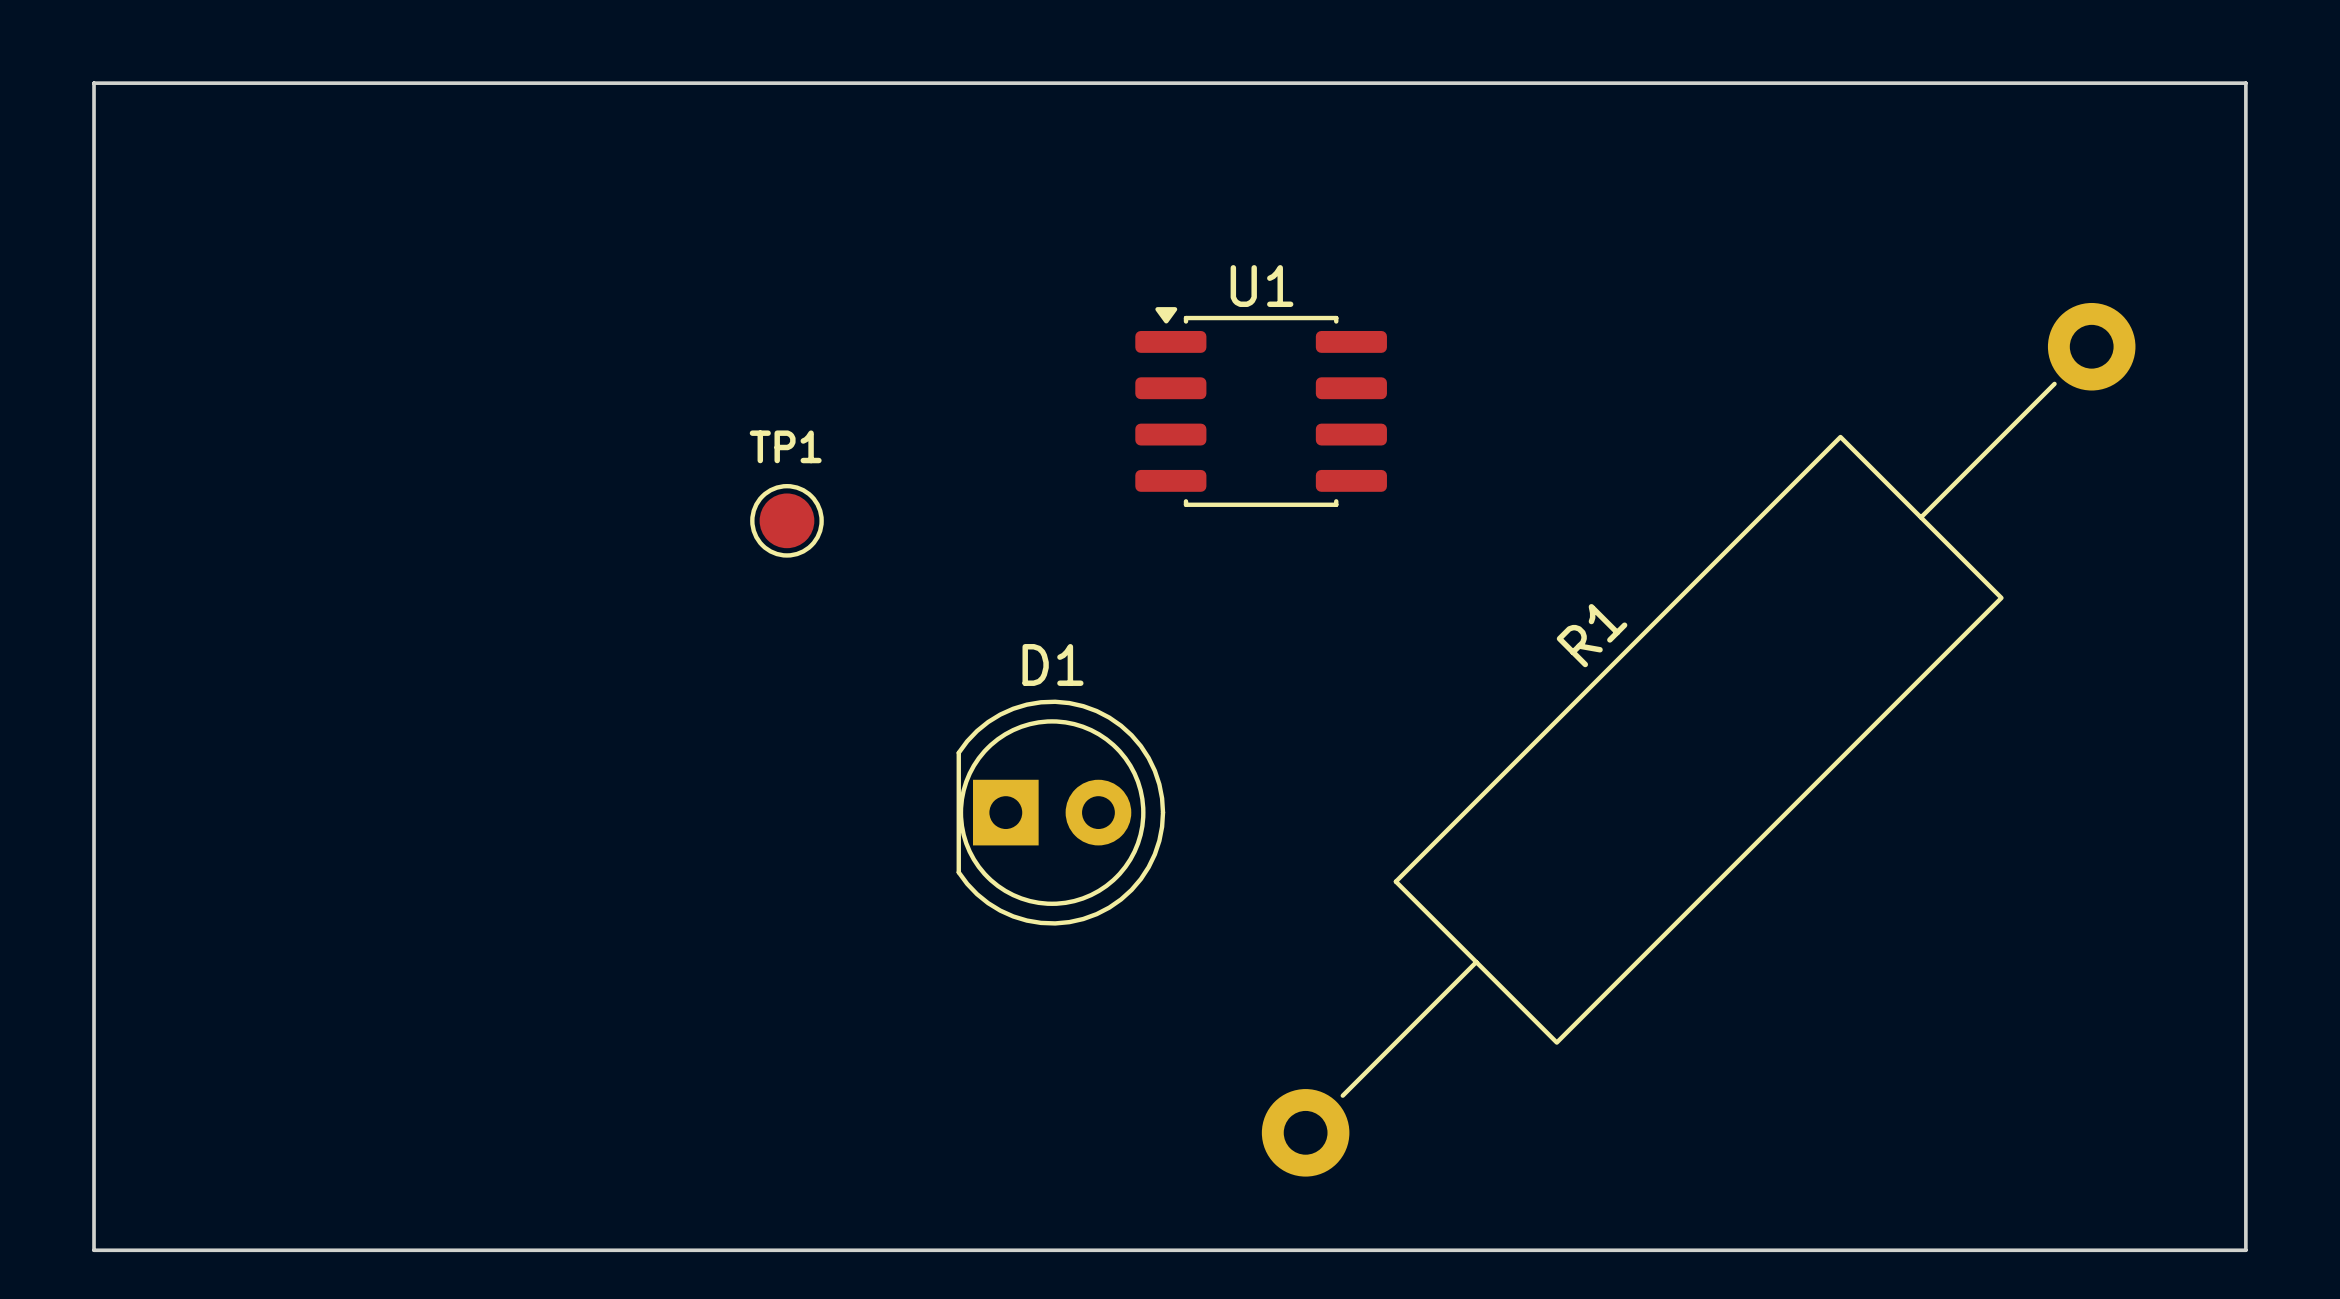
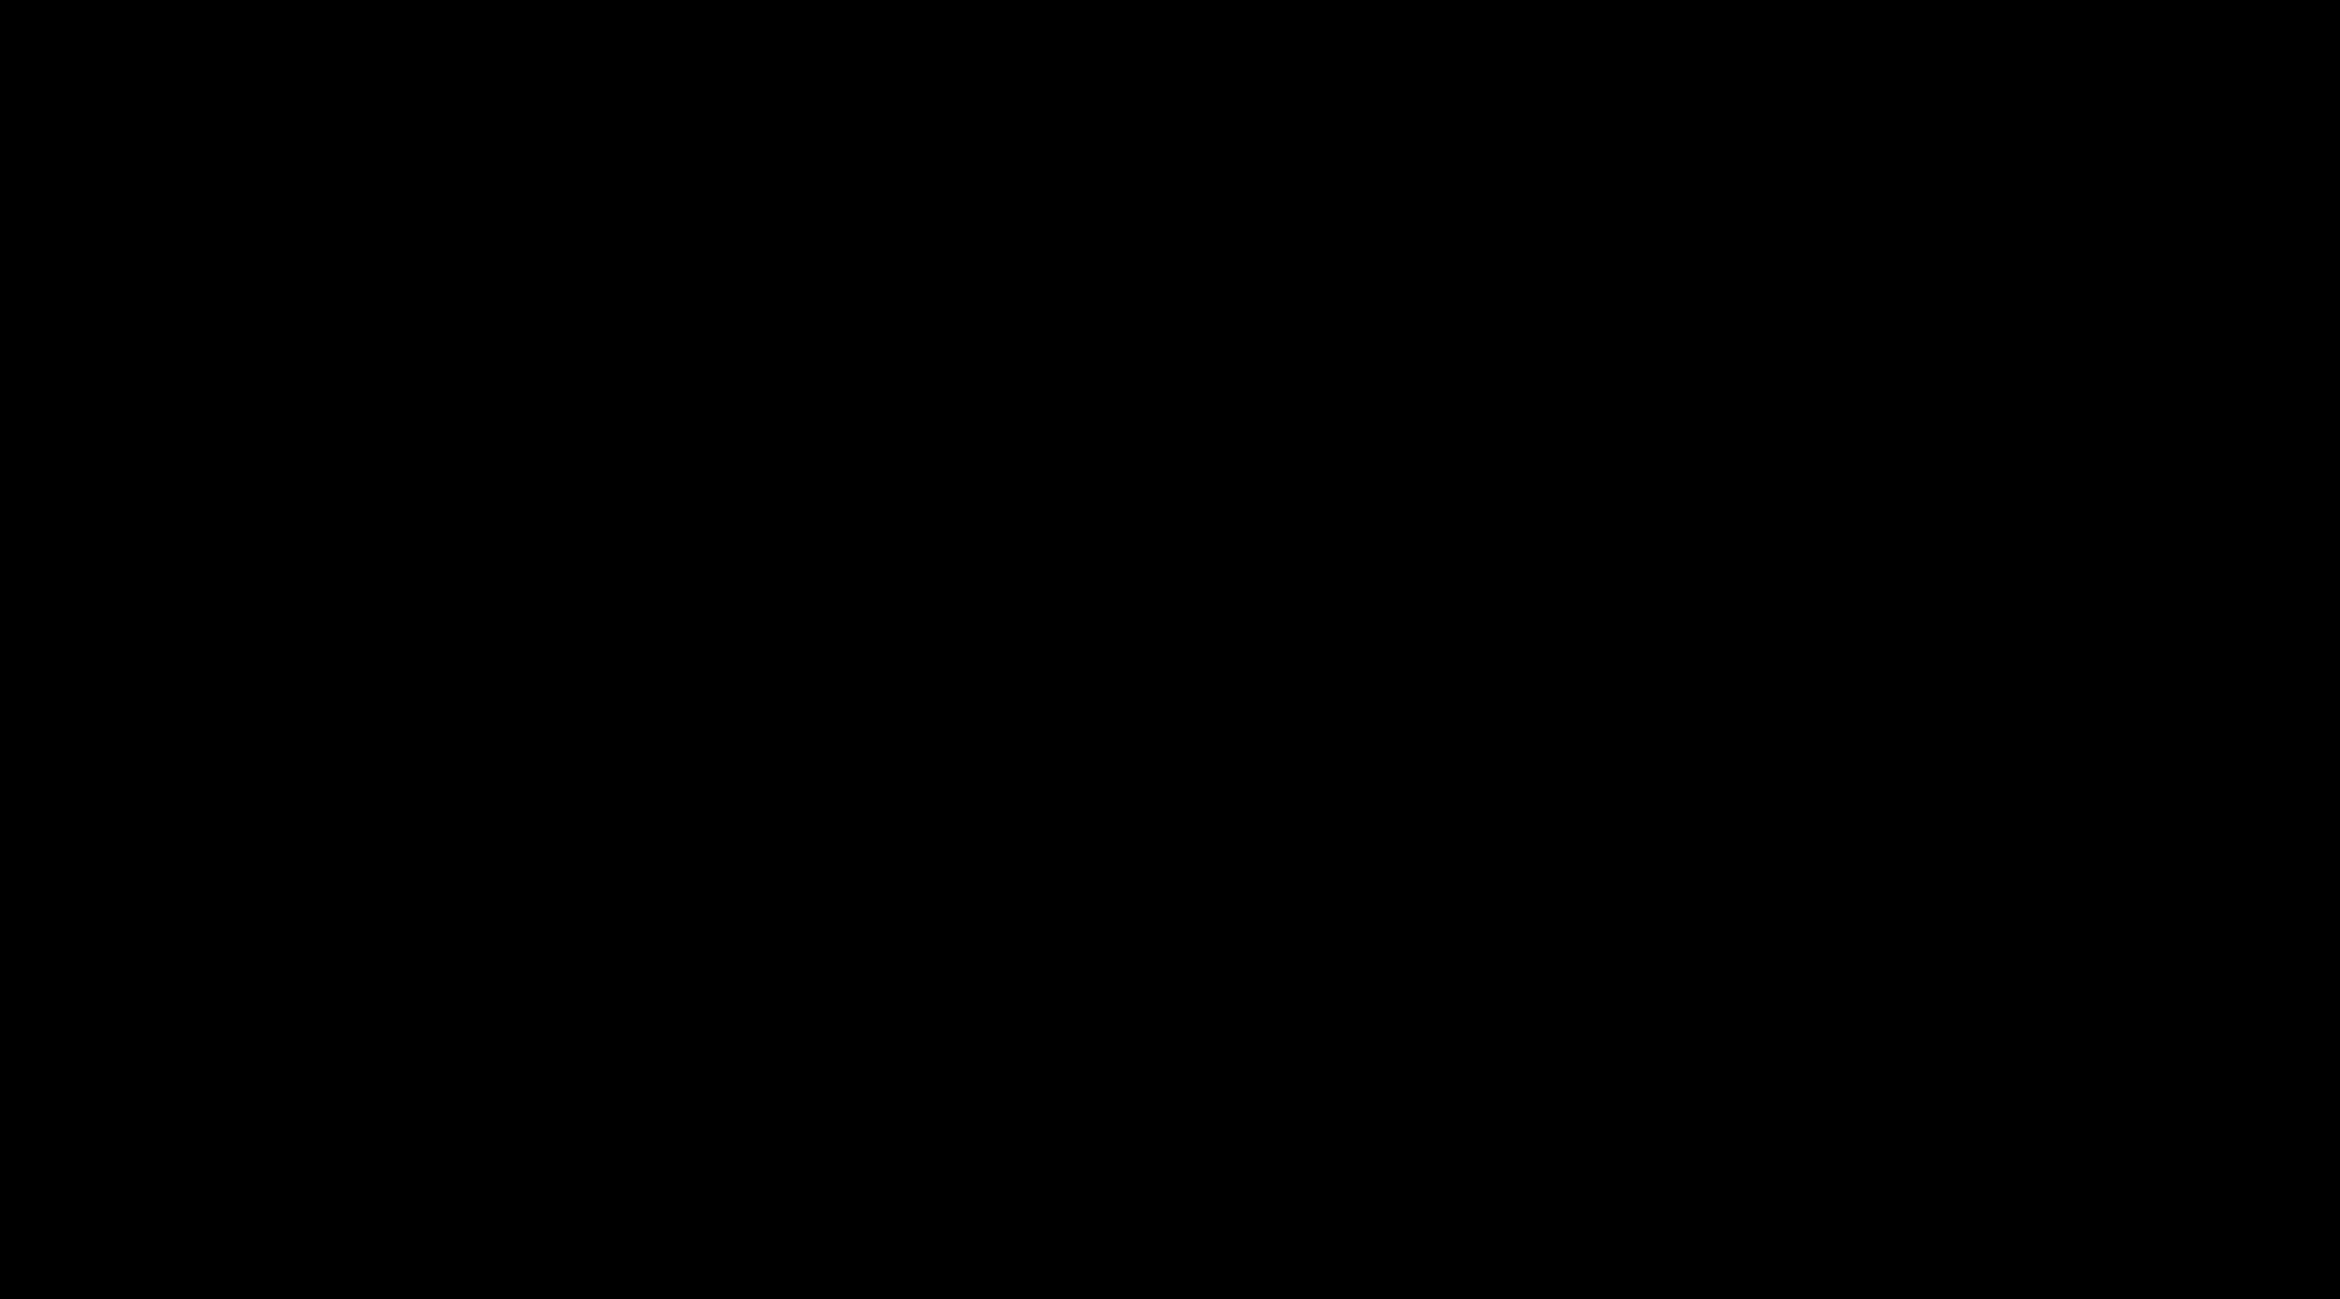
board edge: (94, 83) (2245, 83) (2245, 1250) (94, 1250) (94, 83) -> none
U1: (1261, 407) -> none
TP1: (786, 520) -> none
R1: (1698, 739) -> none
D1: (1060, 812) -> none

